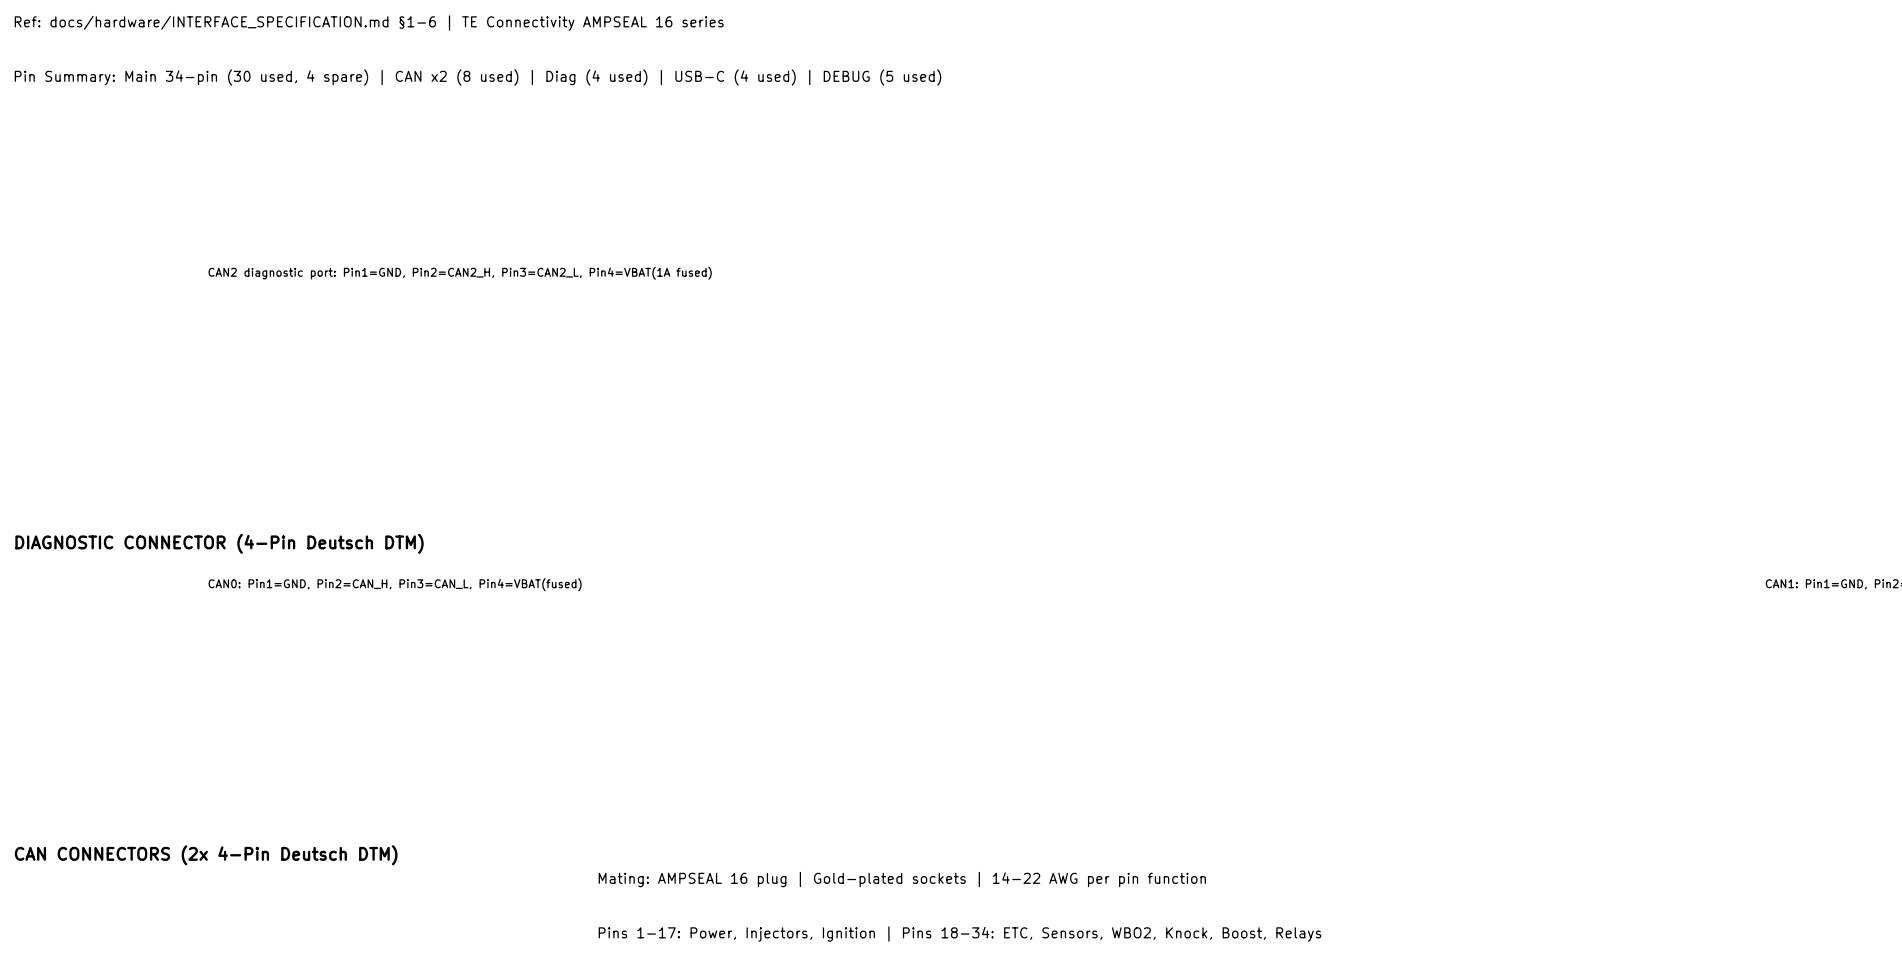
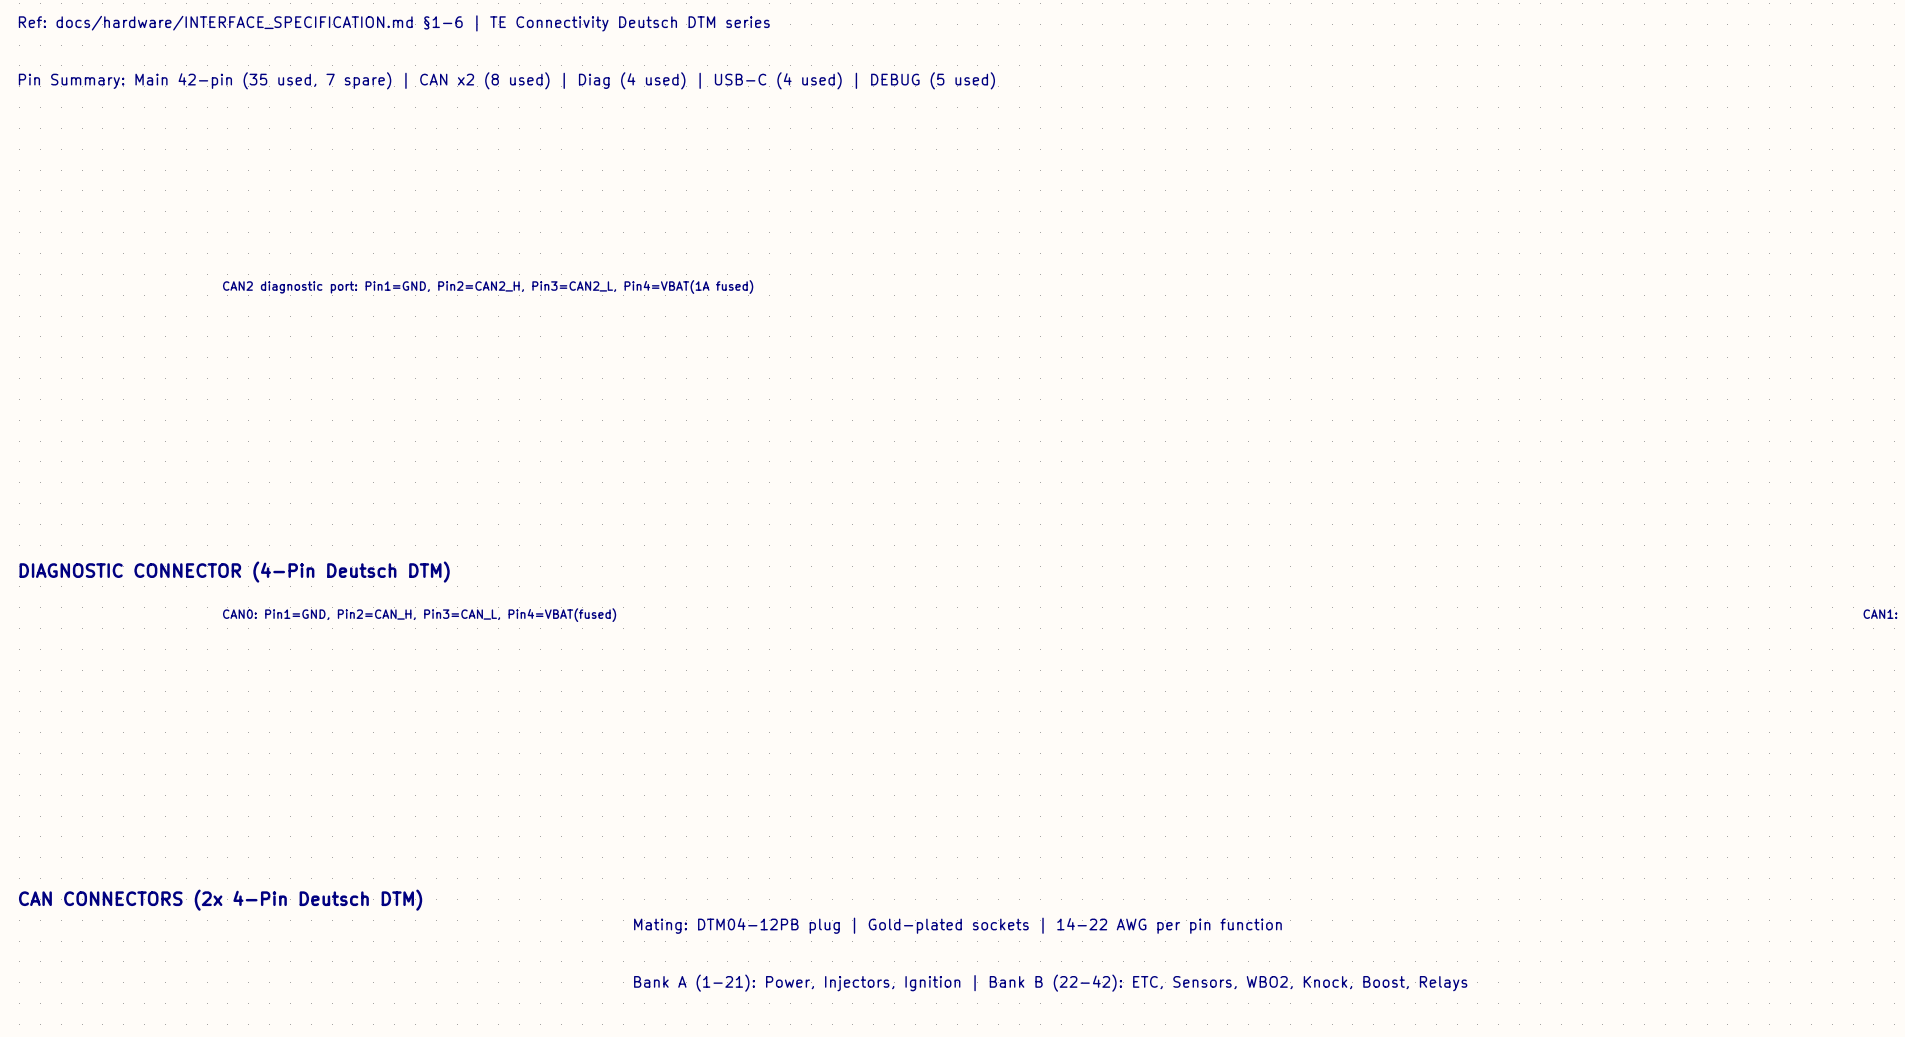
text: Ref: docs/hardware/INTERFACE_SPECIFICATION.md §1-6 | TE Connectivity AMPSEAL 16 series (369, 23) -> Ref: docs/hardware/INTERFACE_SPECIFICATION.md §1-6 | TE Connectivity Deutsch DTM series (394, 23)
text: Pin Summary: Main 34-pin (30 used, 4 spare) | CAN x2 (8 used) | Diag (4 used) | USB-C (4 used) | DEBUG (5 used) (477, 77) -> Pin Summary: Main 42-pin (35 used, 7 spare) | CAN x2 (8 used) | Diag (4 used) | USB-C (4 used) | DEBUG (5 used) (506, 80)
text: Mating: AMPSEAL 16 plug | Gold-plated sockets | 14-22 AWG per pin function (902, 879) -> Mating: DTM04-12PB plug | Gold-plated sockets | 14-22 AWG per pin function (957, 925)
text: Pins 1-17: Power, Injectors, Ignition | Pins 18-34: ETC, Sensors, WBO2, Knock, Boost, Relays (960, 934) -> Bank A (1-21): Power, Injectors, Ignition | Bank B (22-42): ETC, Sensors, WBO2, Knock, Boost, Relays (1050, 983)

